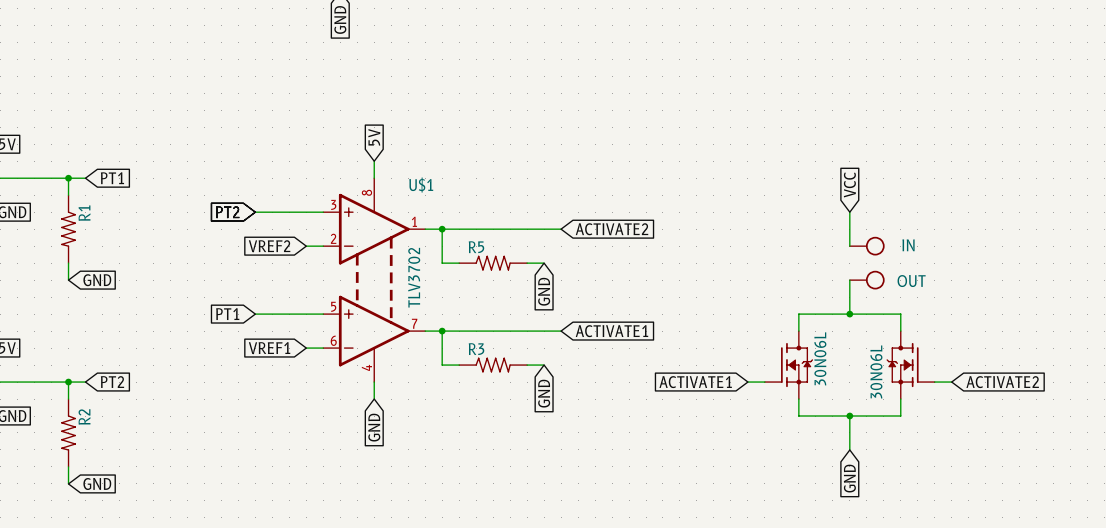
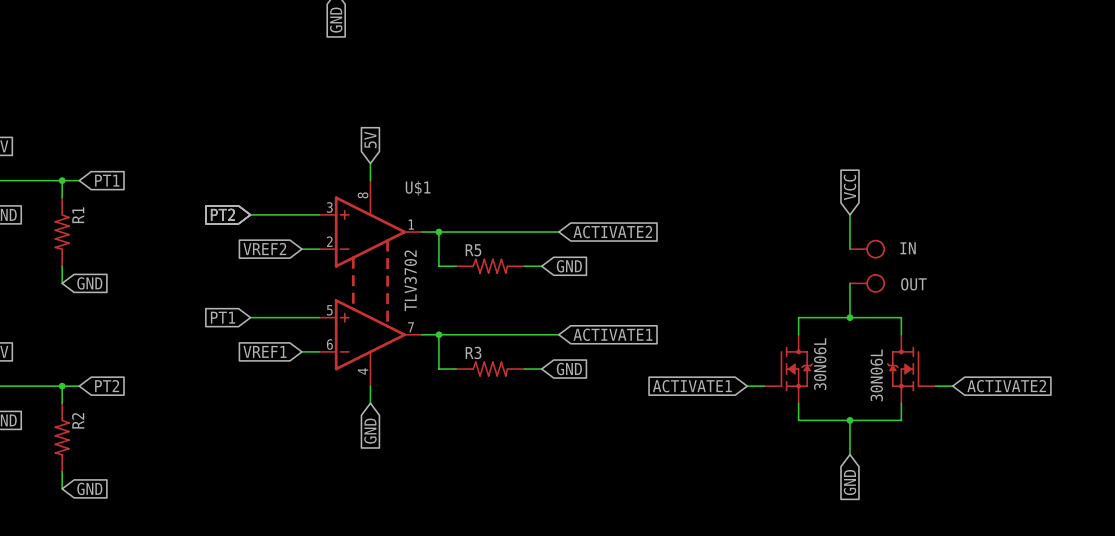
global label rotation: 0° (544, 291) -> 90° counterclockwise (569, 266)
global label rotation: 0° (544, 393) -> 90° counterclockwise (569, 369)

